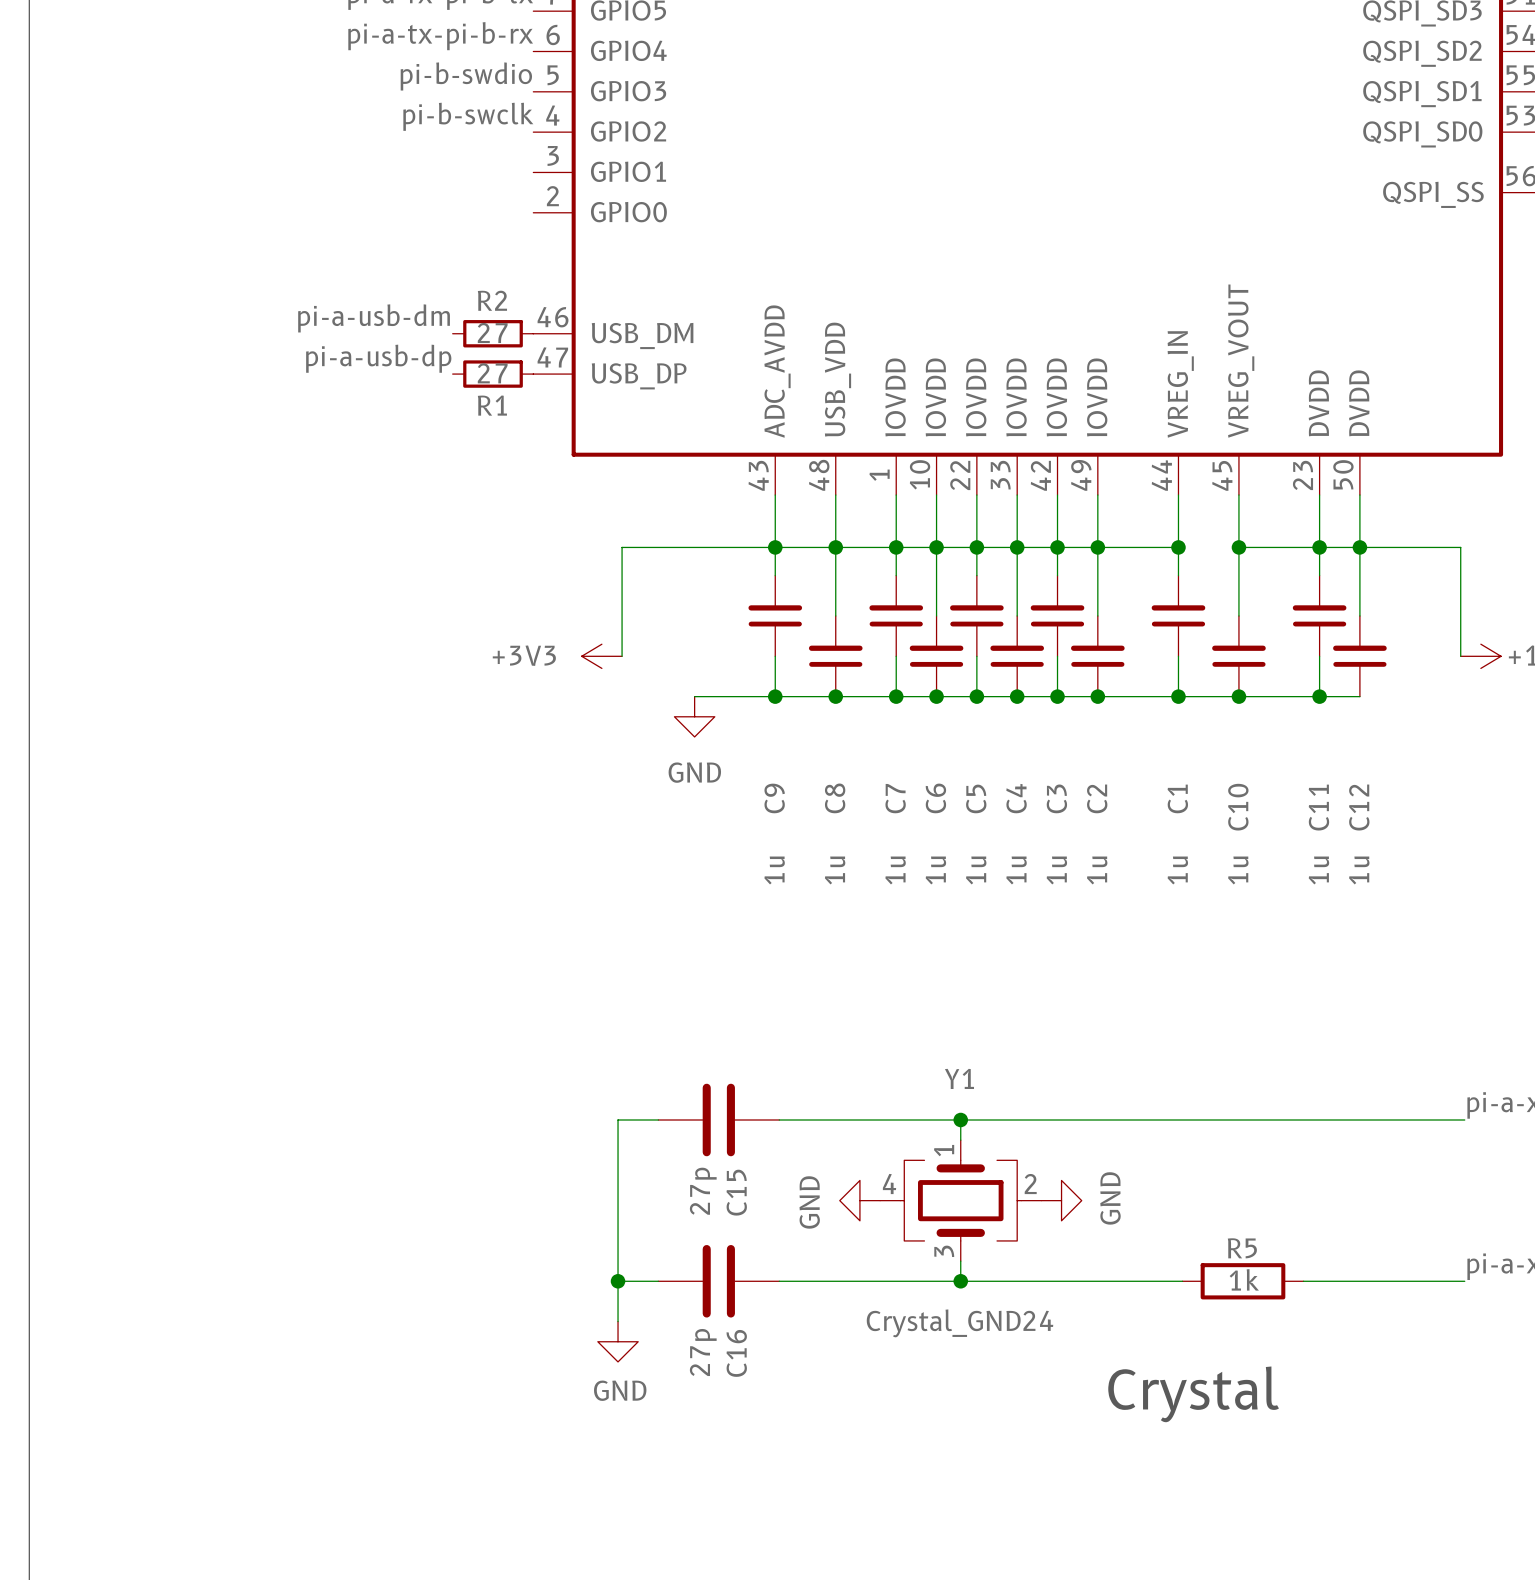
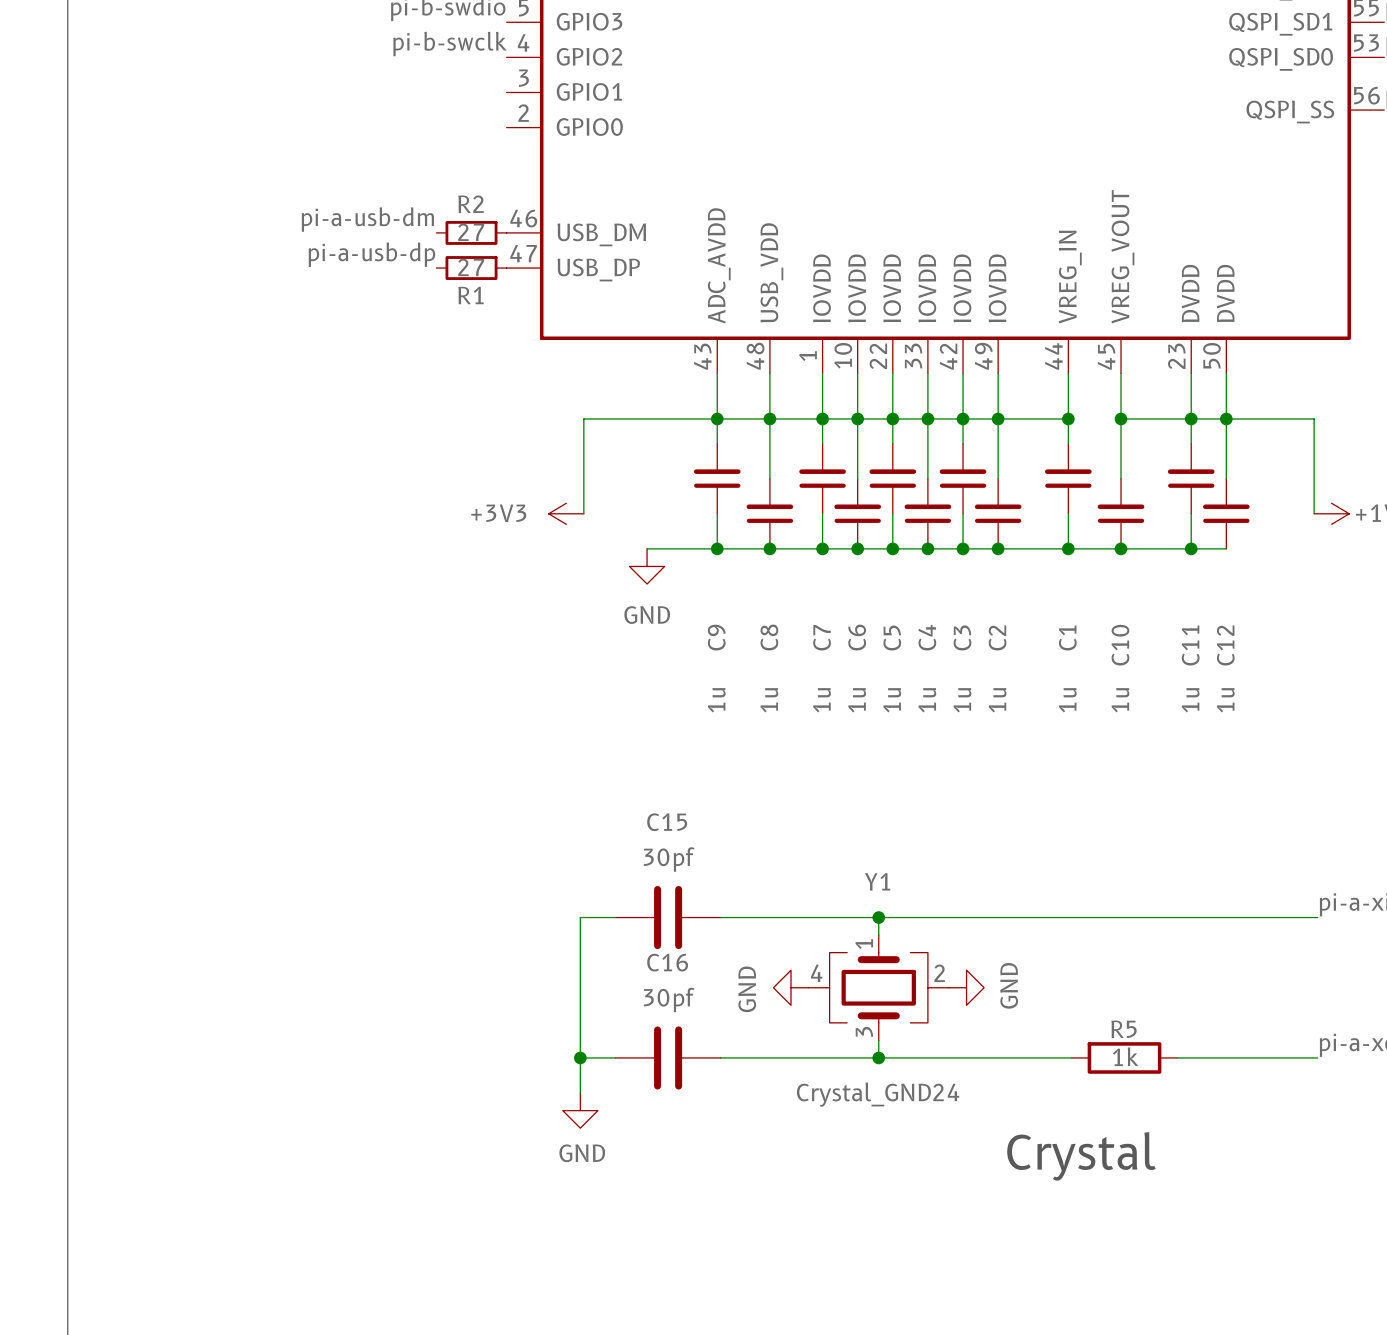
C15 value: 27p (703, 1191) -> 30pf (669, 859)
C15 name rotation: 0° (736, 1192) -> 90° clockwise (667, 822)
C15 name position: C15 (736, 1192) -> C15 (667, 822)
C16 value: 27p (703, 1352) -> 30pf (669, 999)
C16 name rotation: 0° (736, 1353) -> 90° clockwise (667, 962)
C16 name position: C16 (736, 1353) -> C16 (667, 962)

